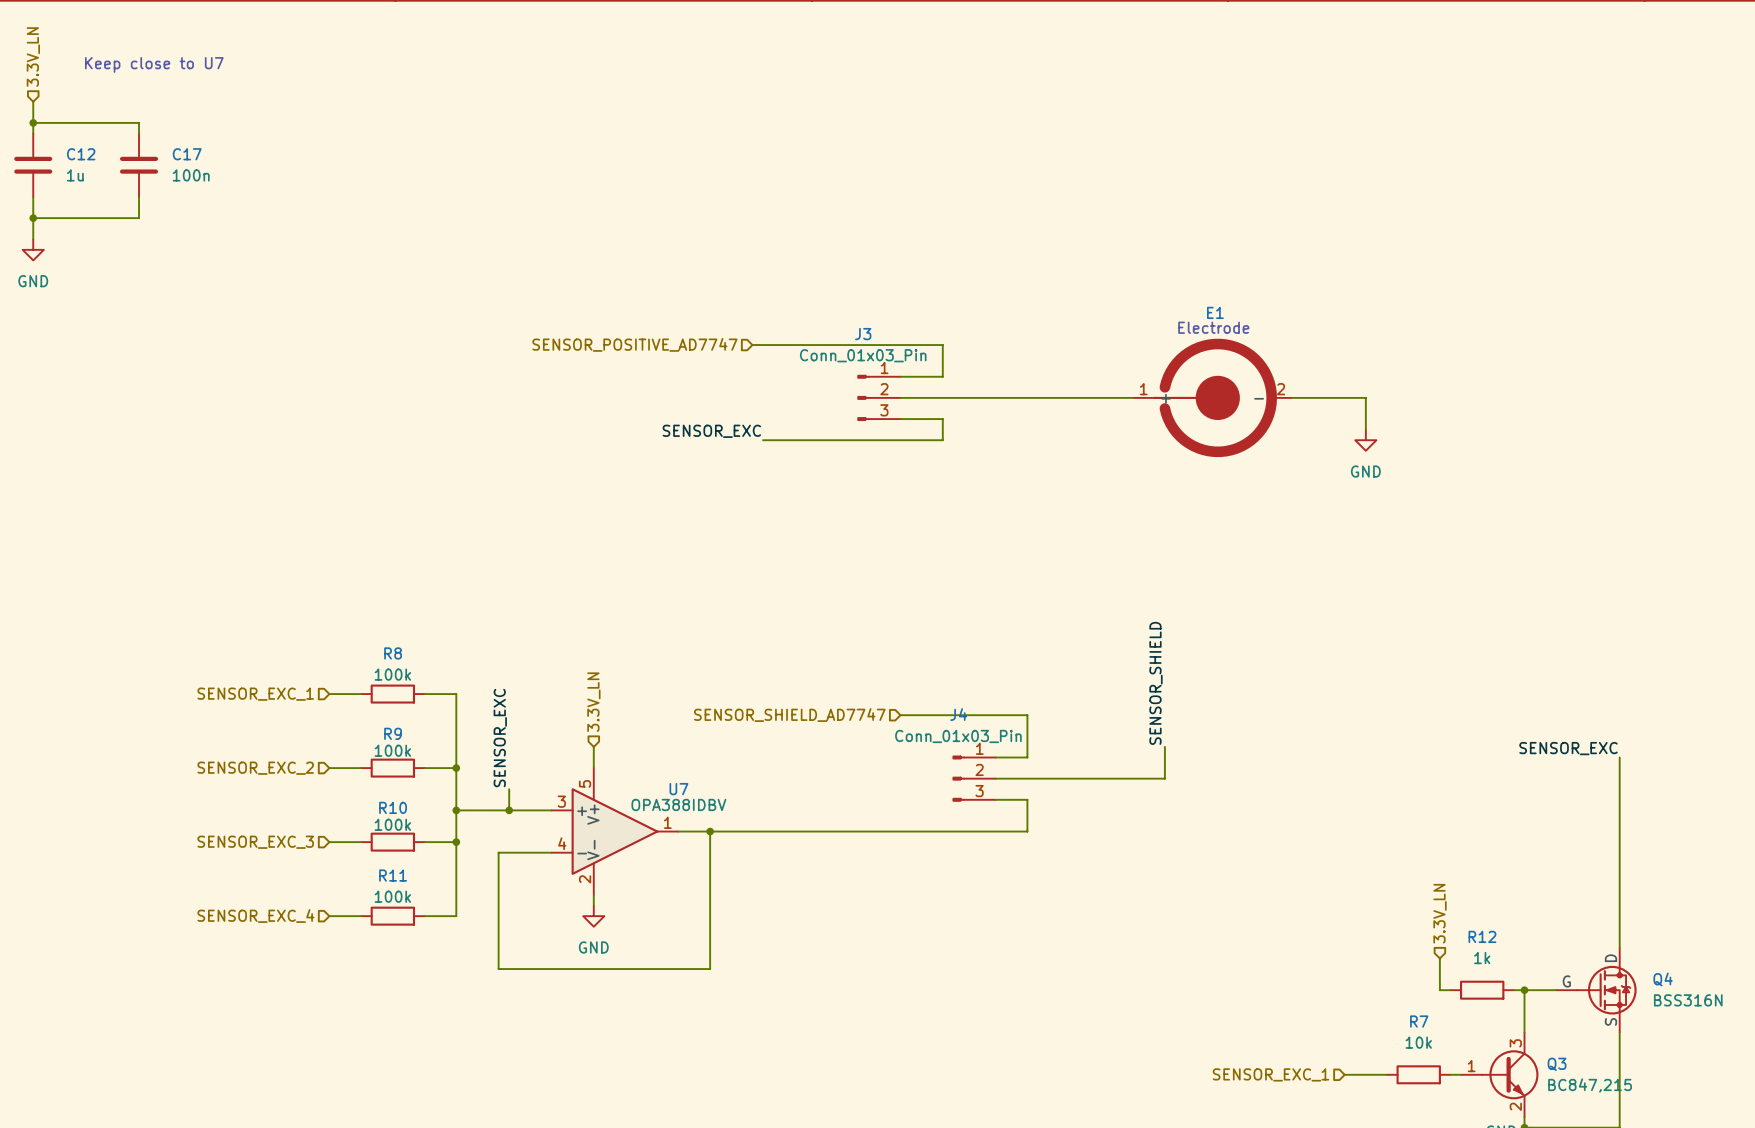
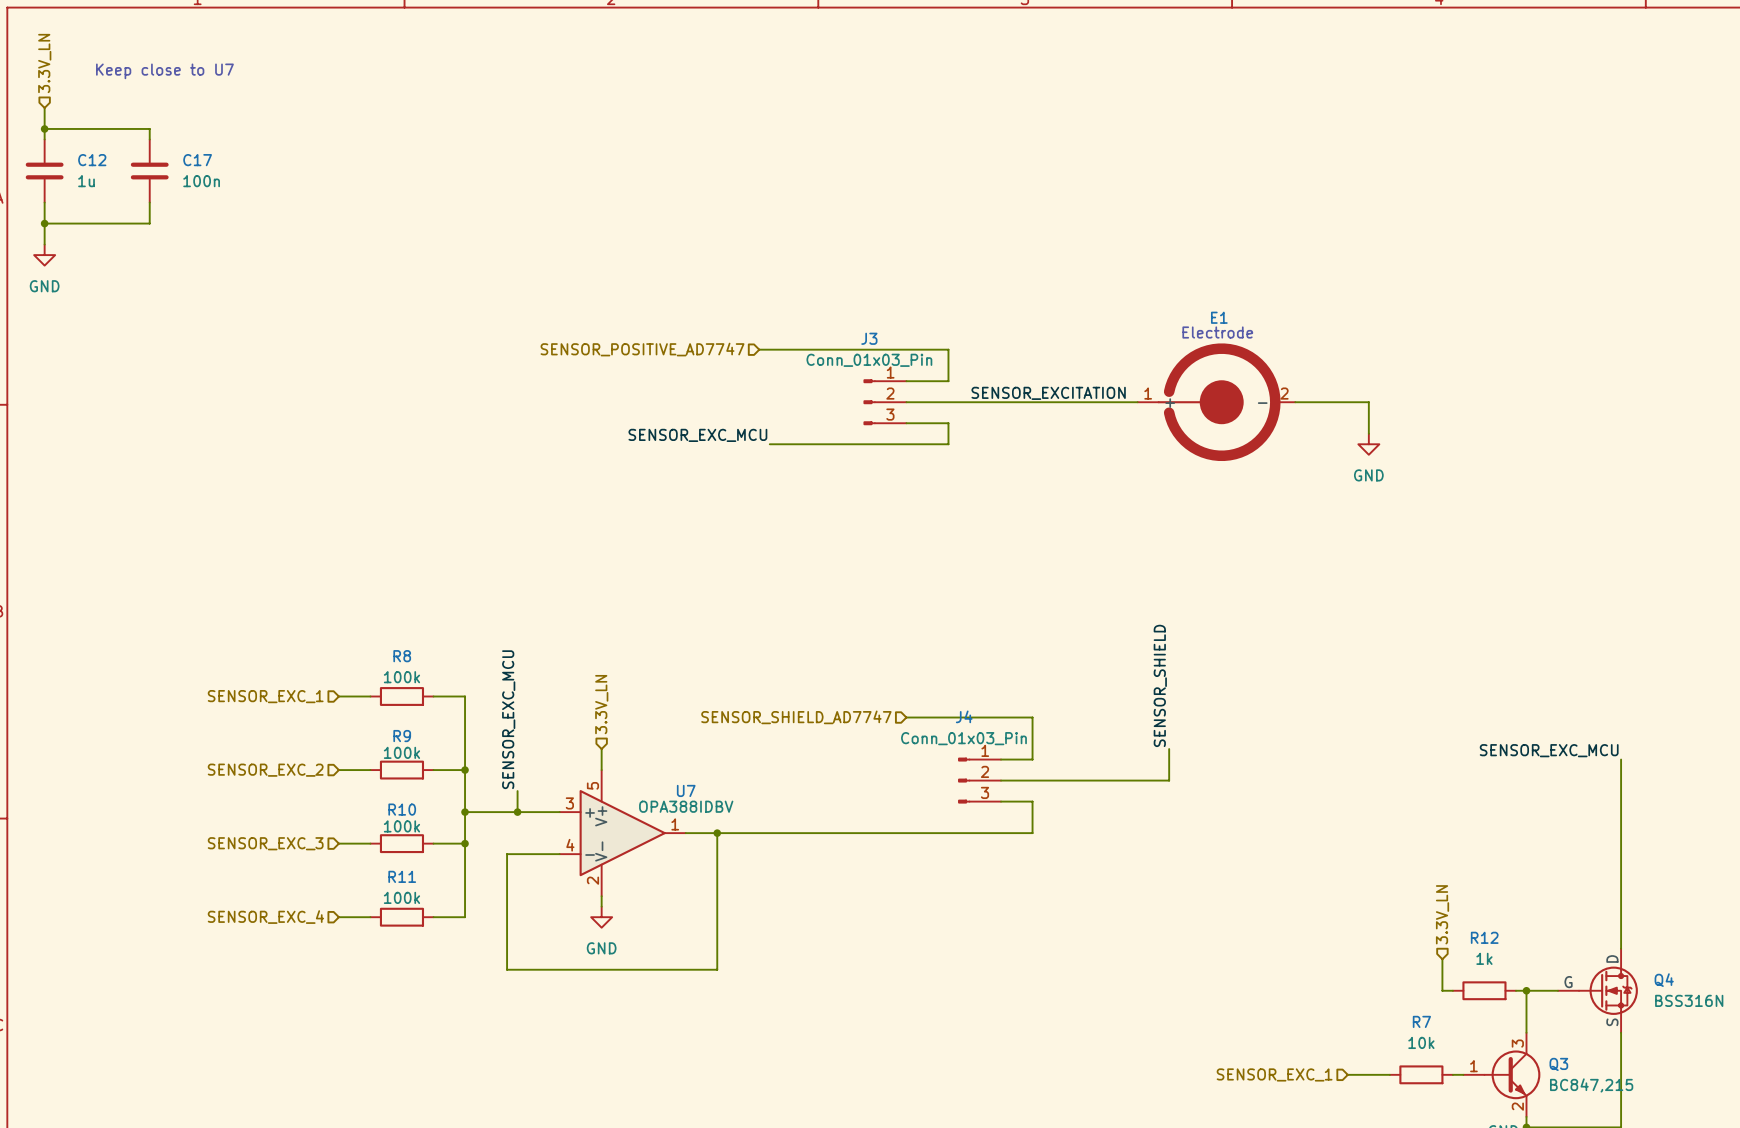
label: none -> SENSOR_EXCITATION (1048, 393)
label: SENSOR_EXC (711, 431) -> SENSOR_EXC_MCU (697, 435)
label: SENSOR_EXC (500, 738) -> SENSOR_EXC_MCU (508, 719)
label: SENSOR_EXC (1568, 748) -> SENSOR_EXC_MCU (1549, 750)

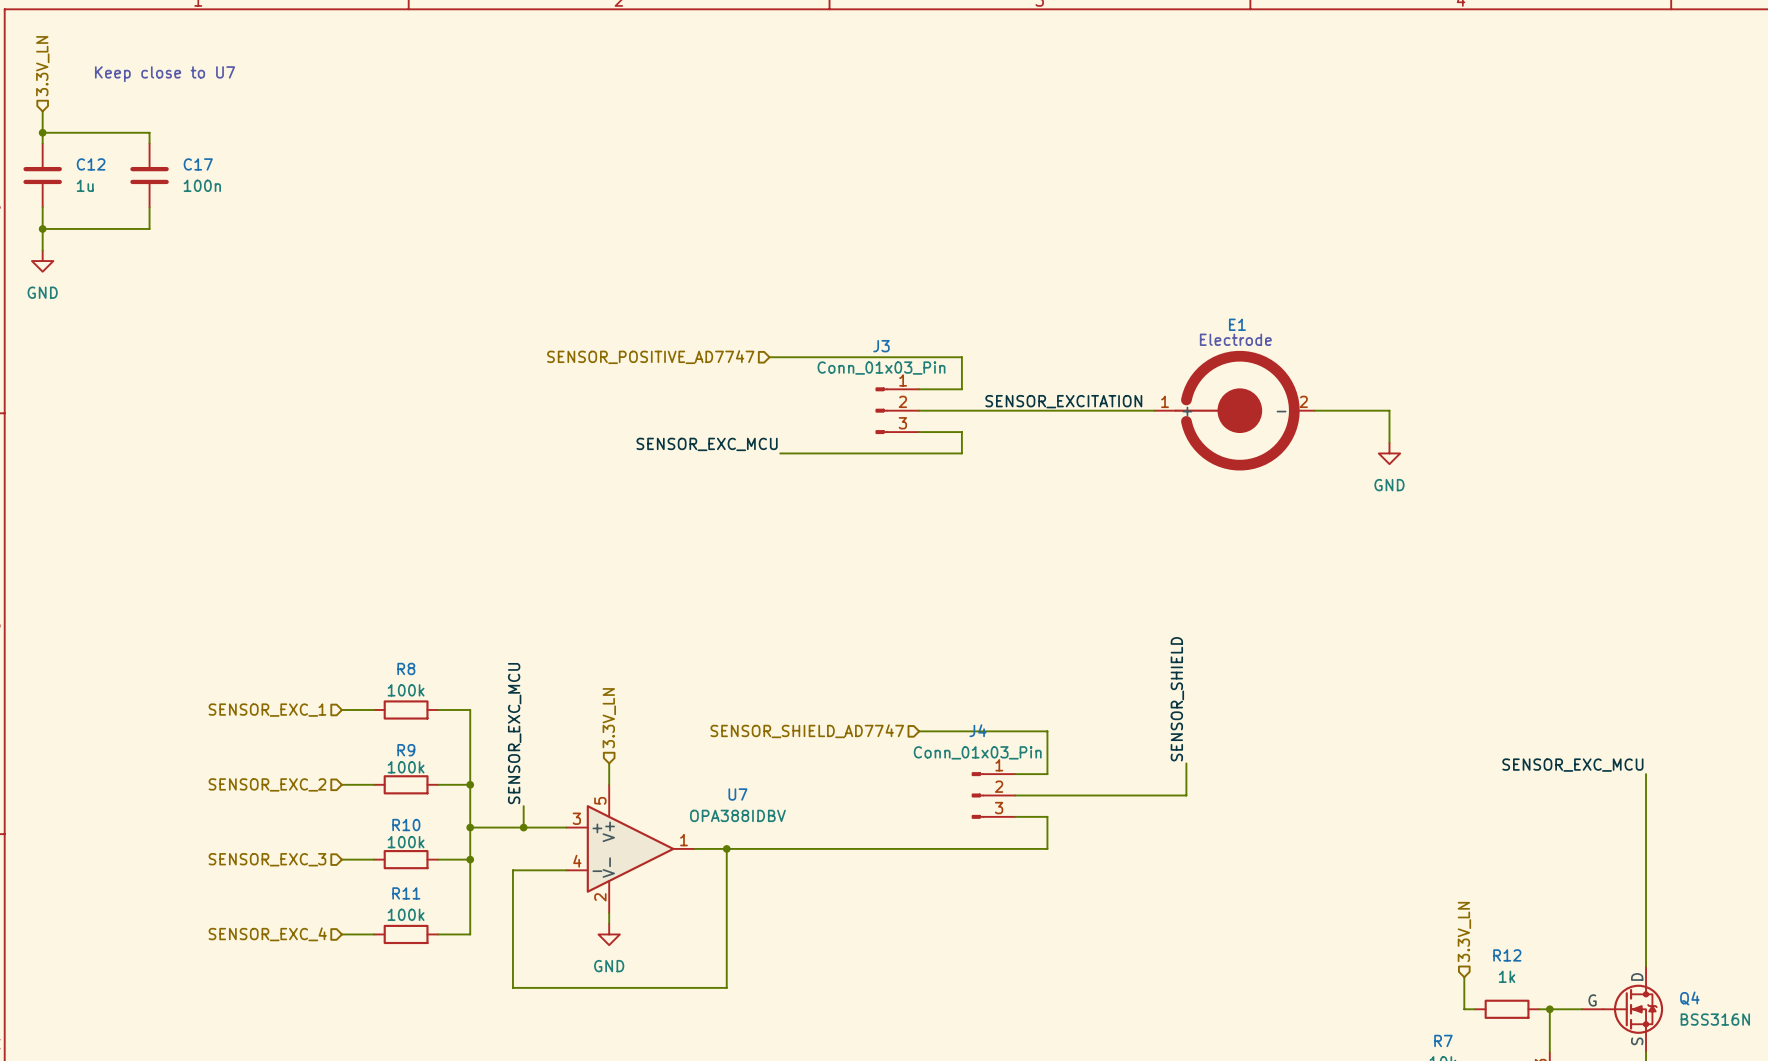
U7 name position: U7 (686, 790) -> U7 (737, 794)
U7 value position: OPA388IDBV (686, 806) -> OPA388IDBV (737, 815)

